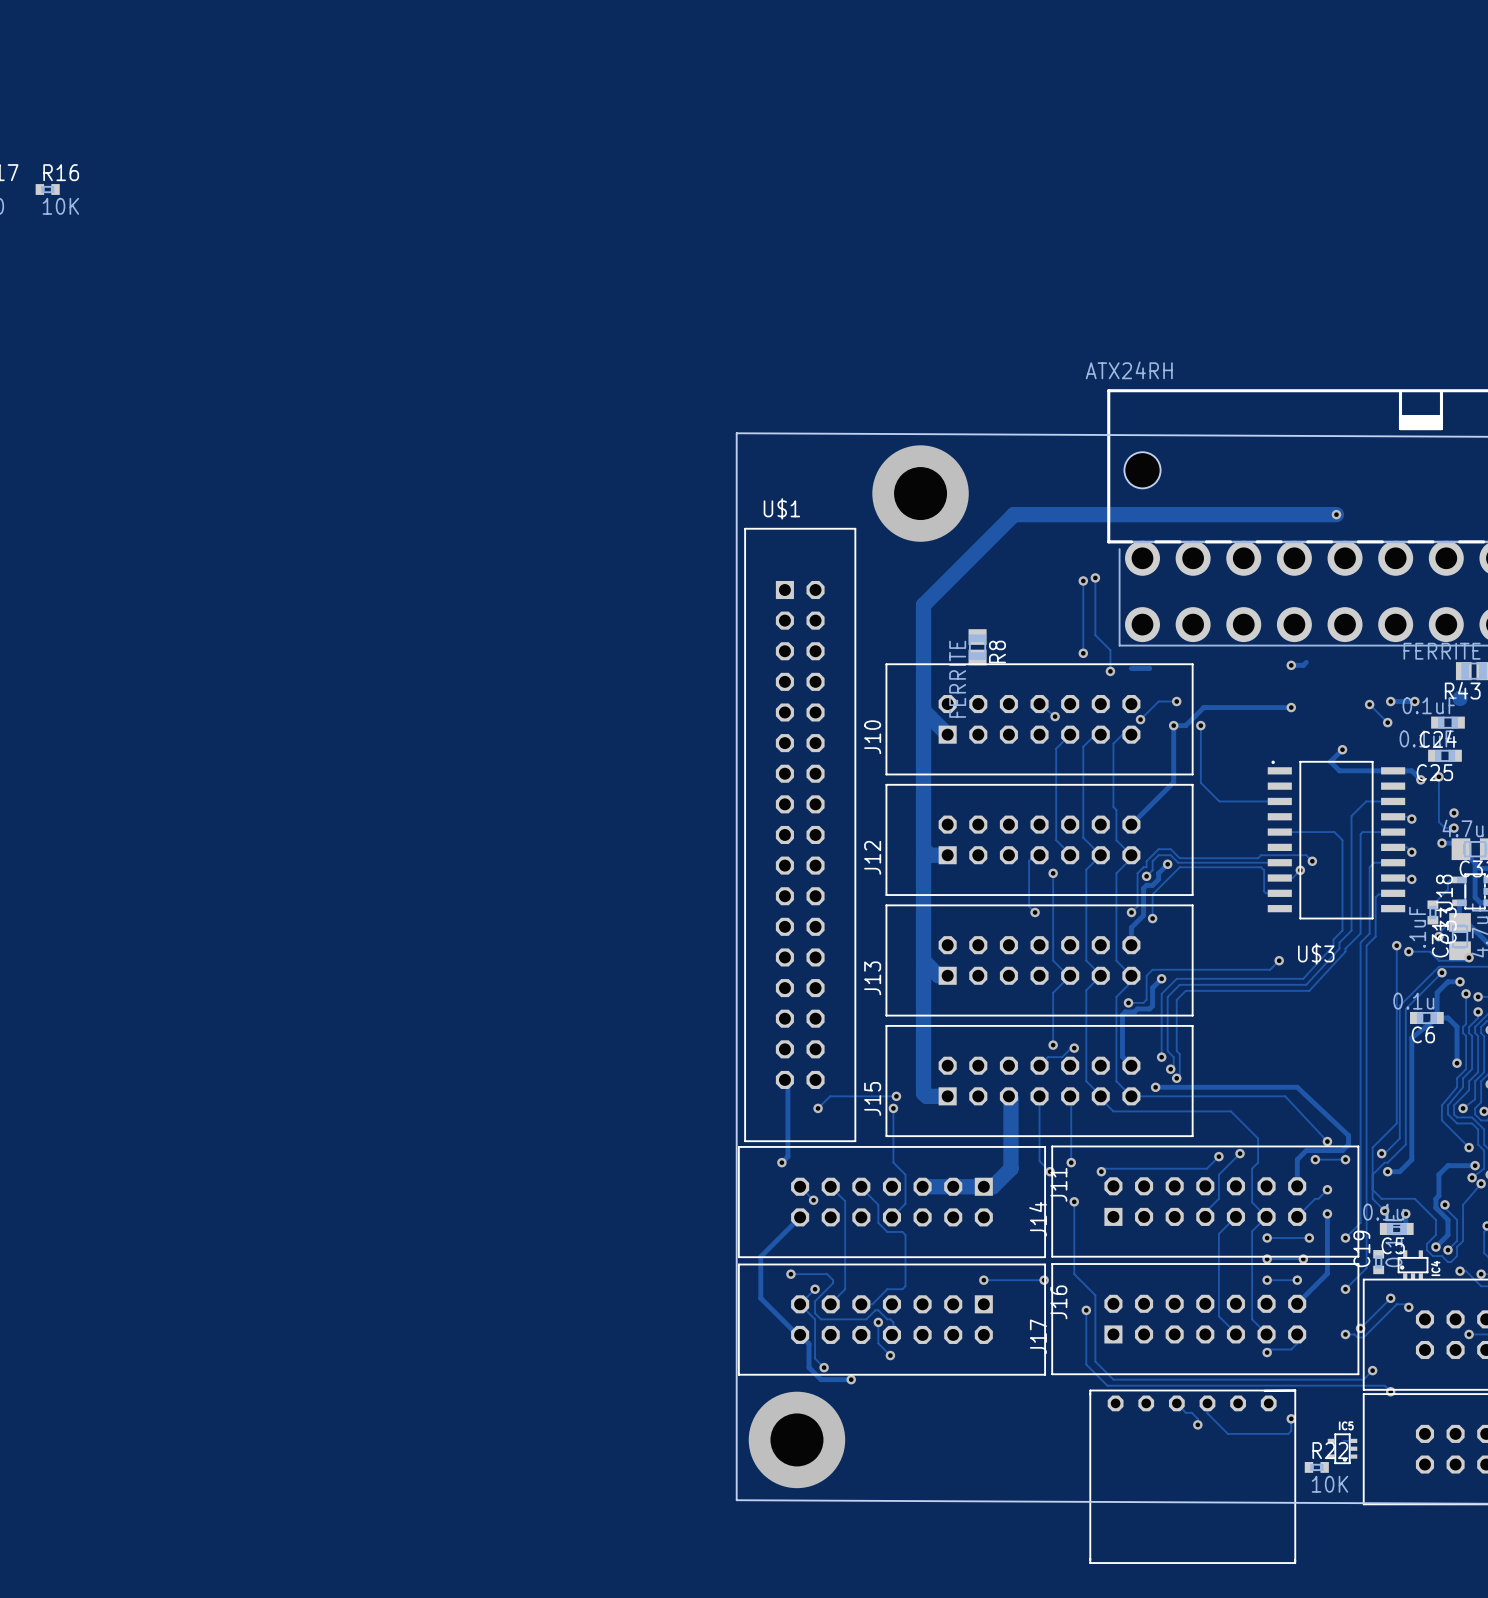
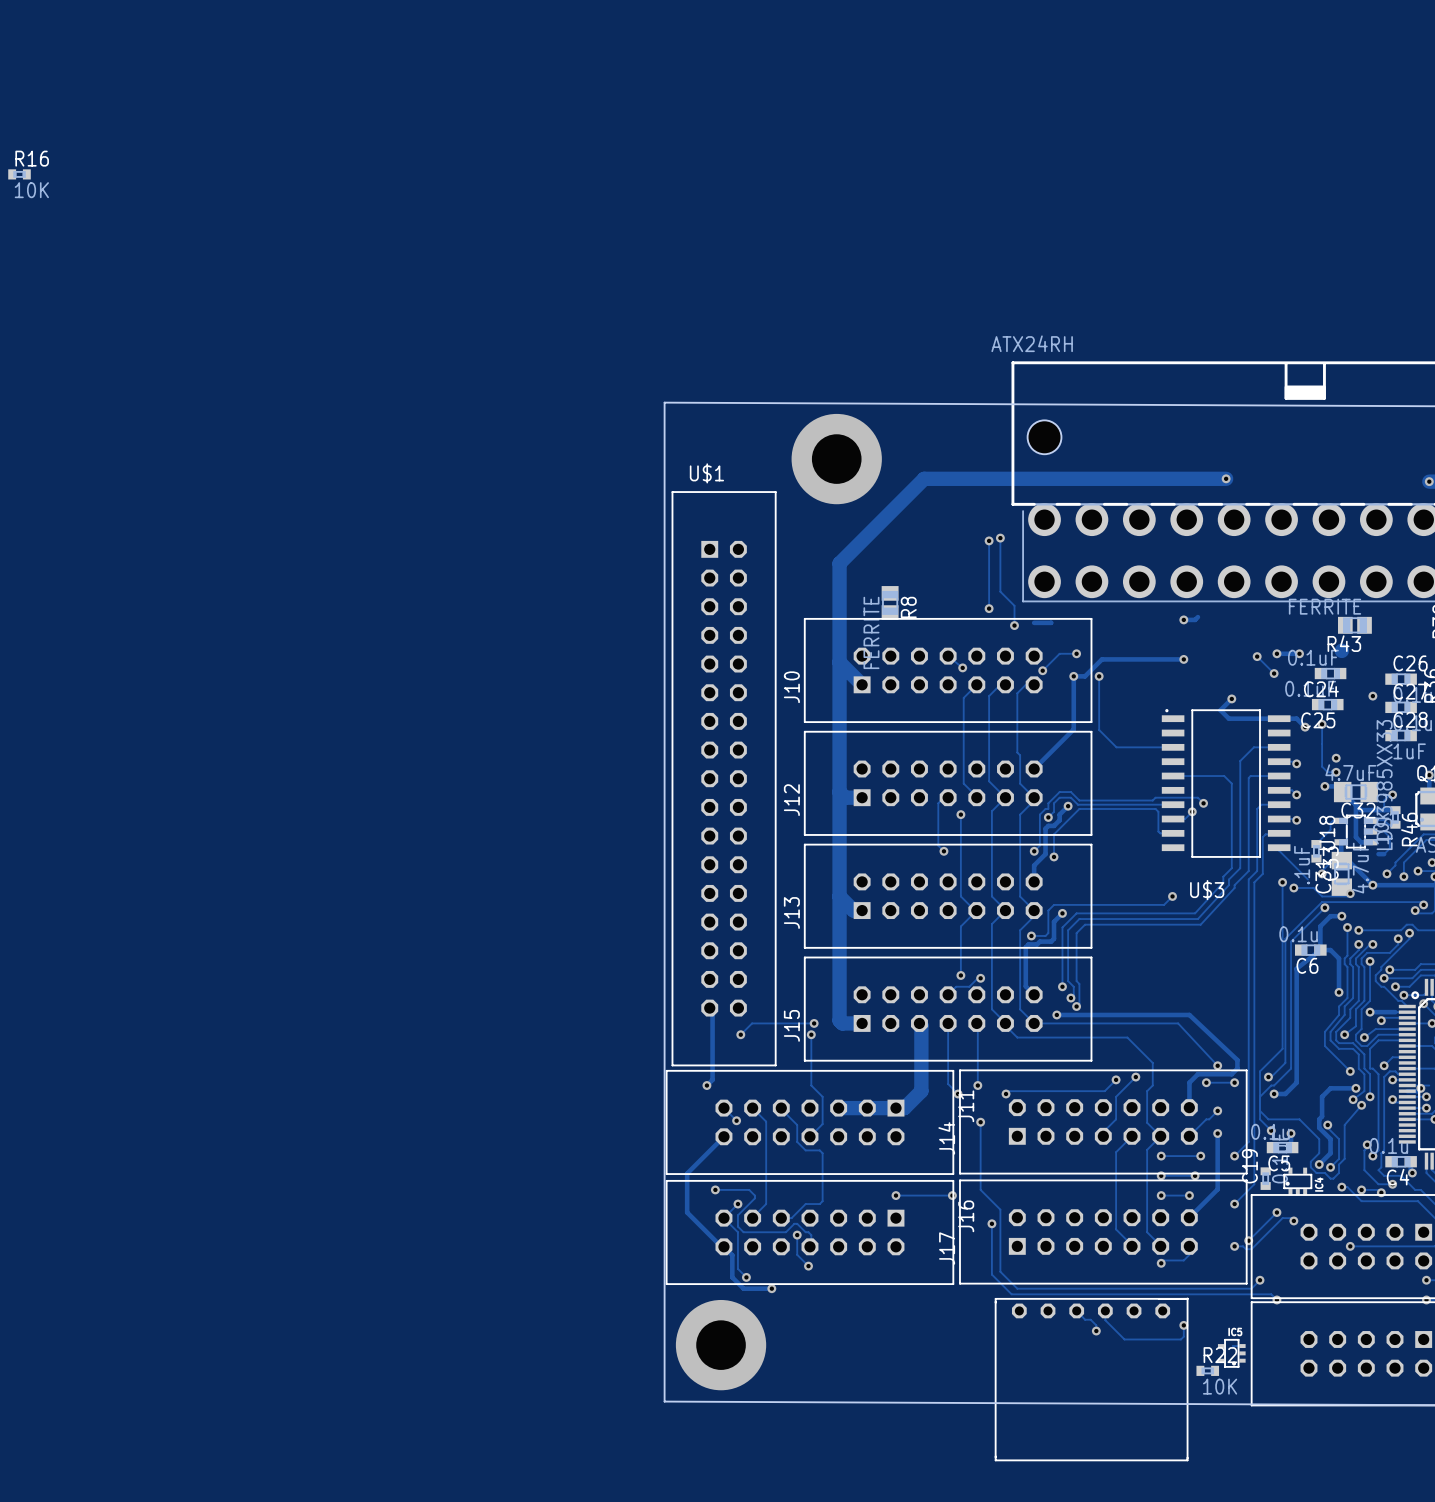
track: none -> (1279, 847) (1279, 850) (1307, 879)

